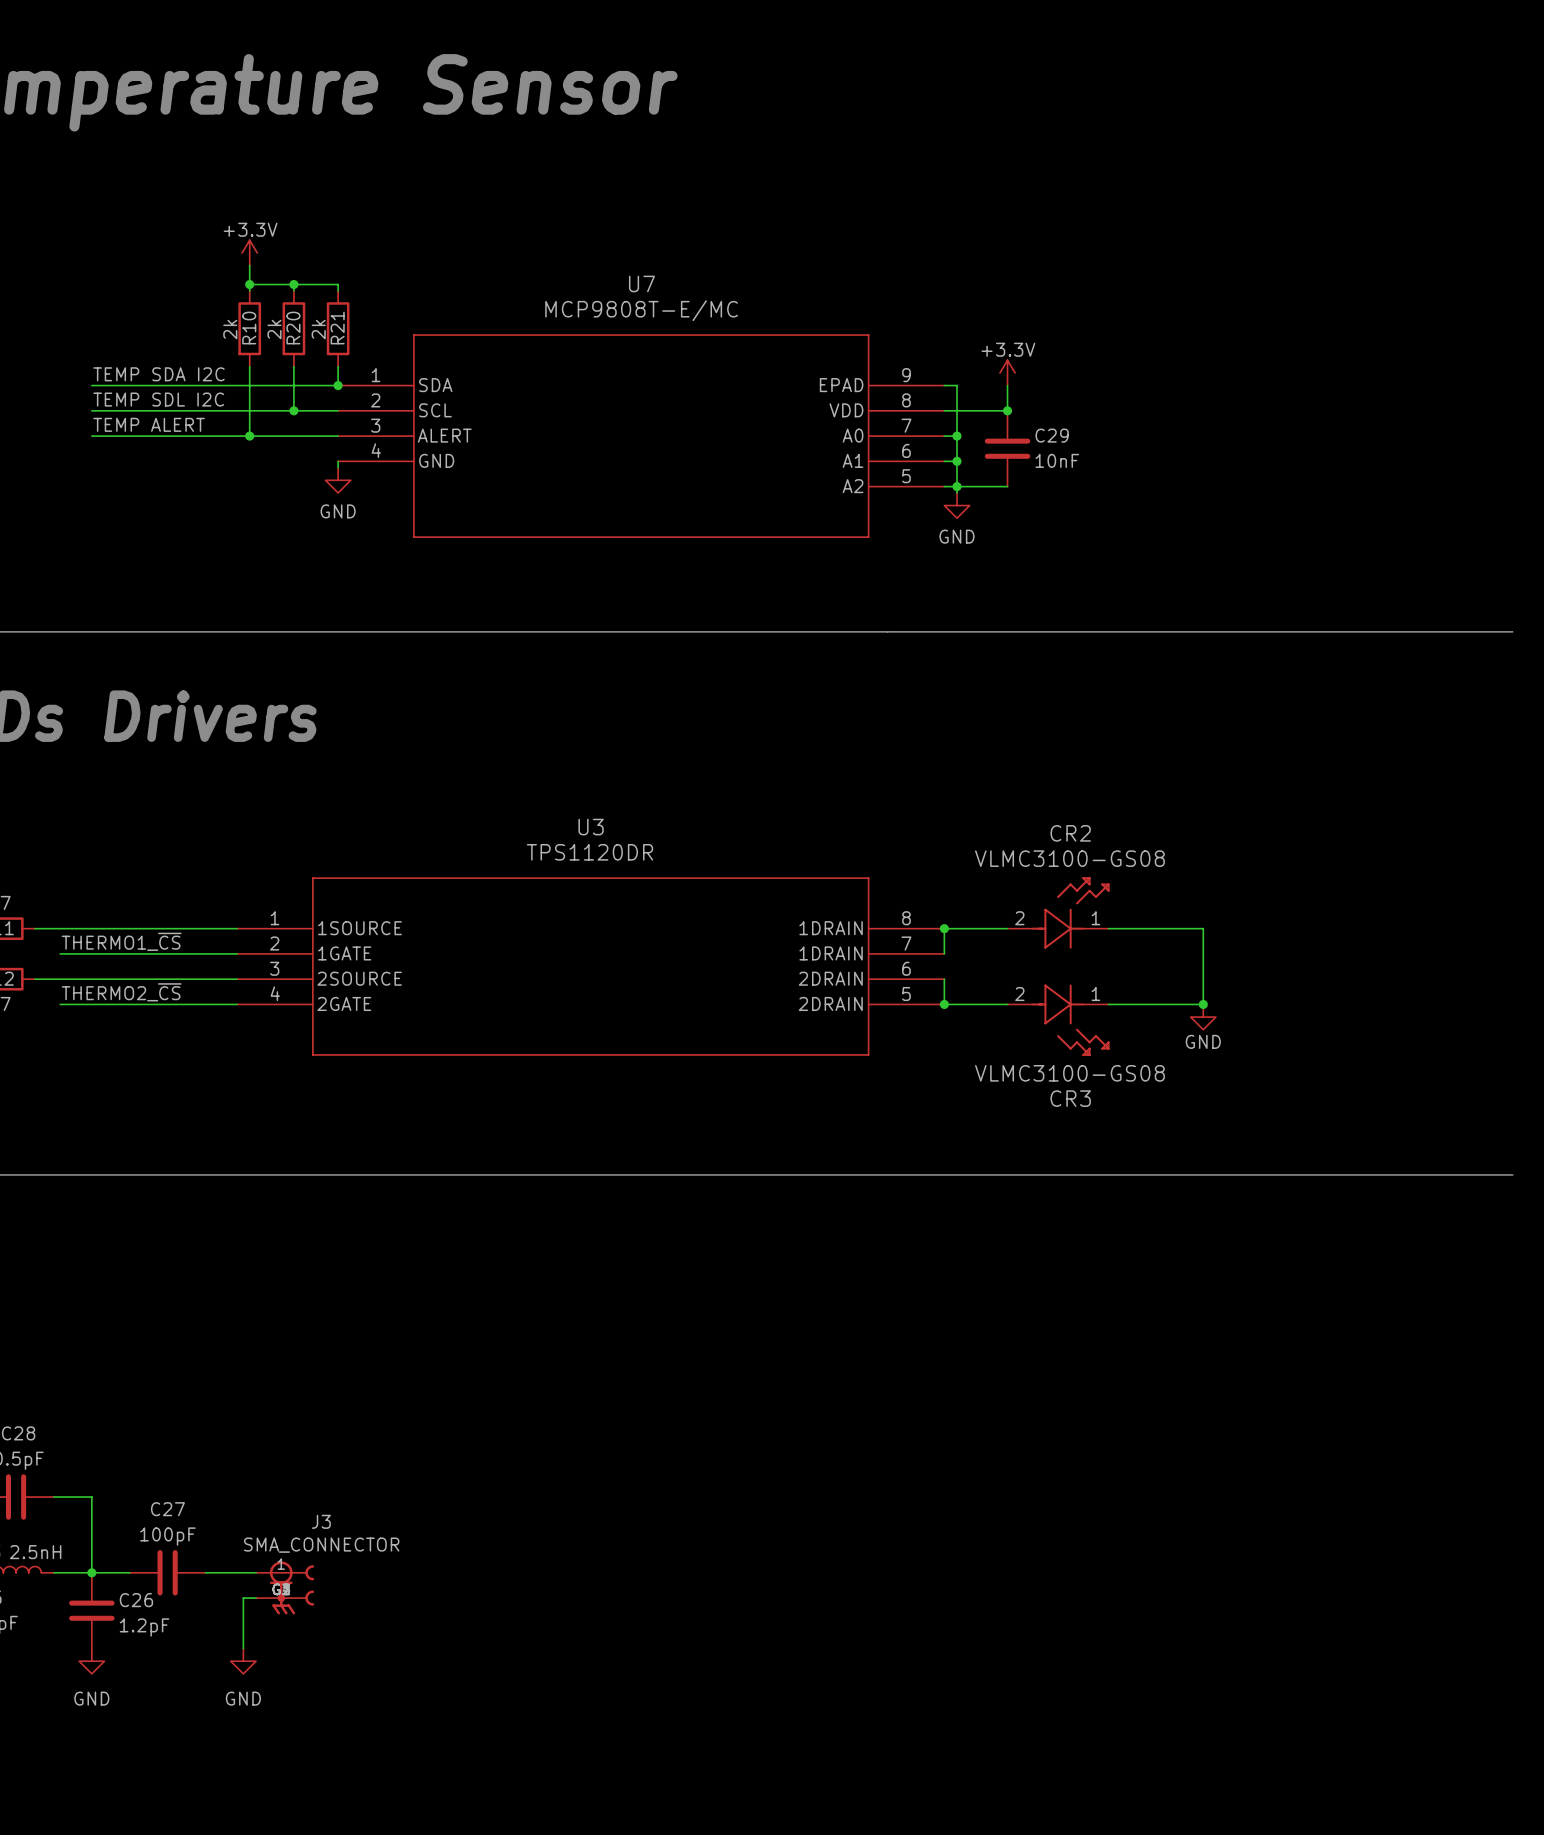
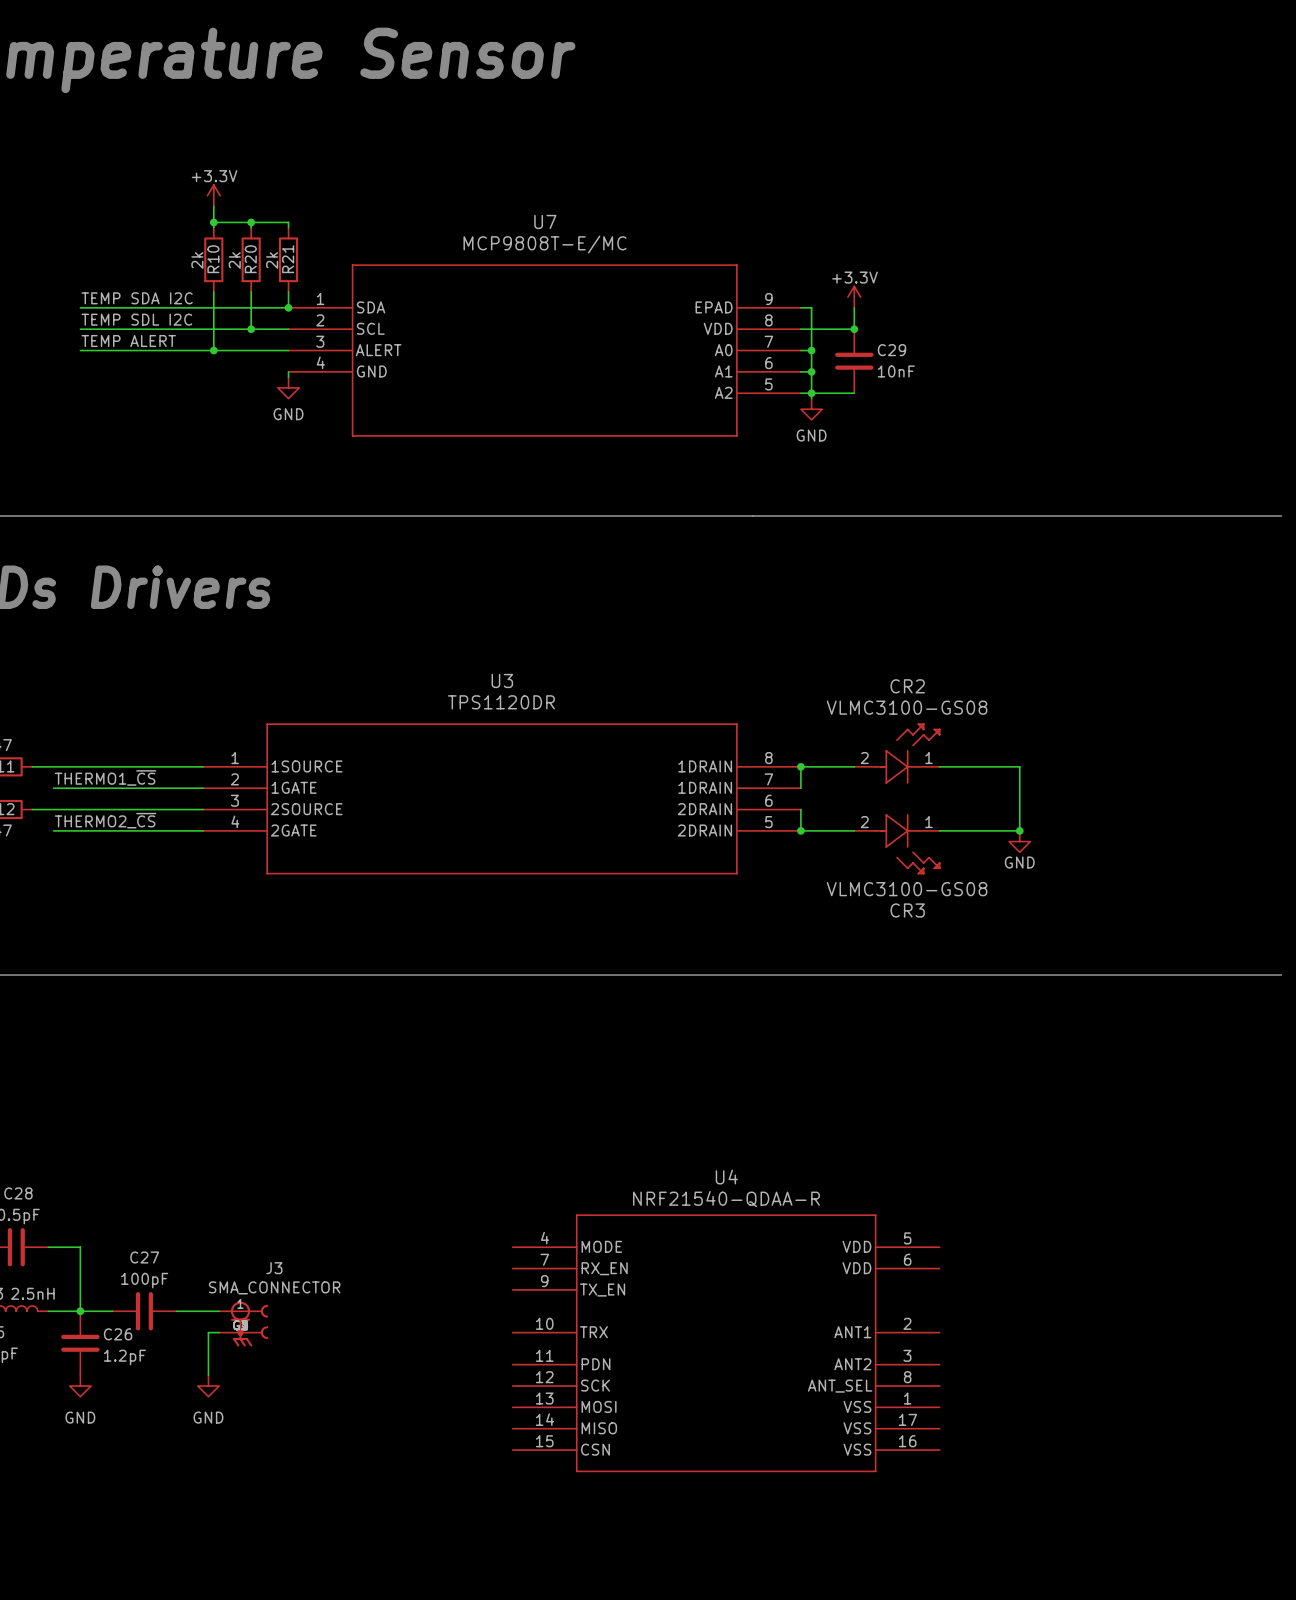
U4: none -> NRF21540-QDAA-R (726, 1343)

